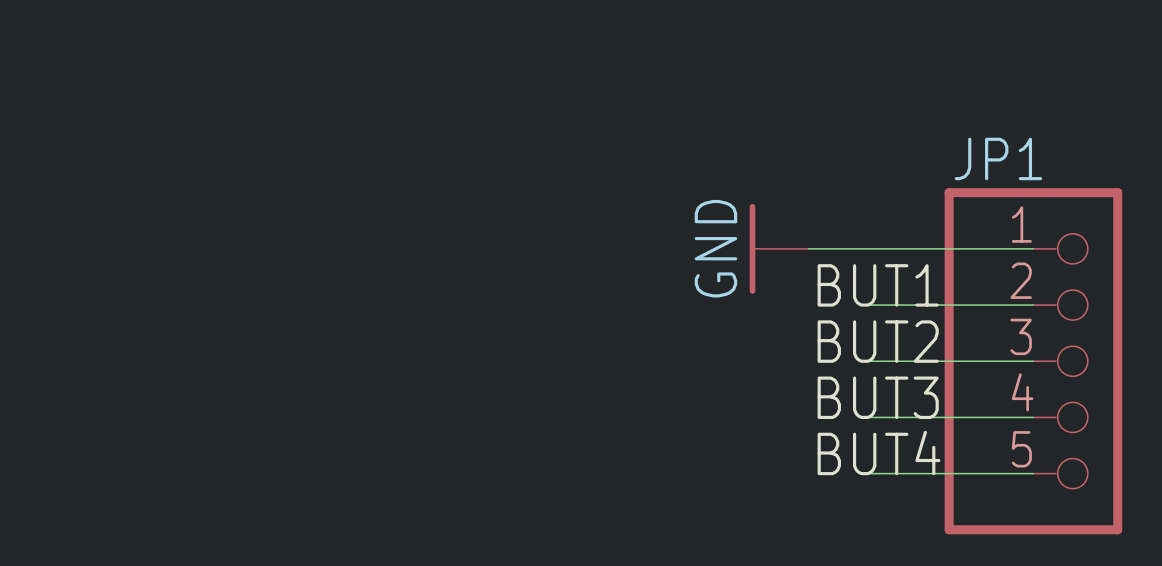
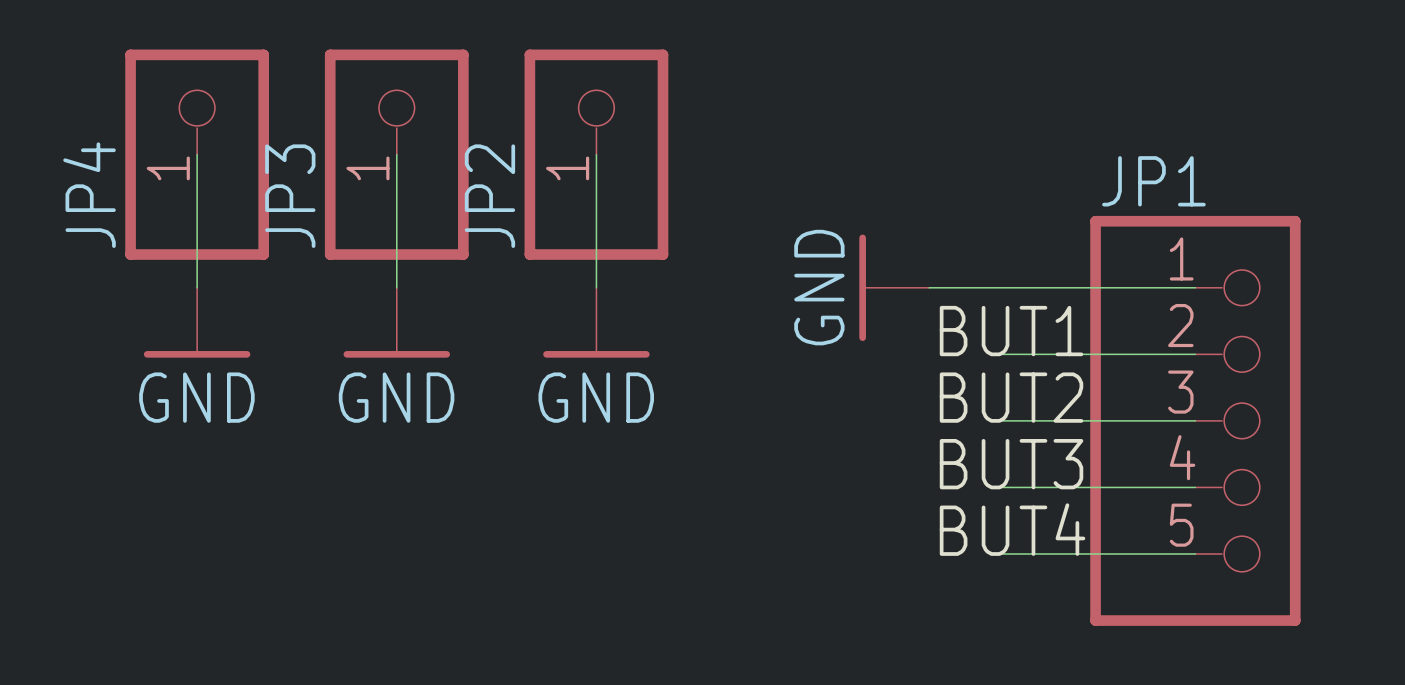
wire: none -> (197, 154) (197, 287)
JP4: none -> (197, 154)
wire: none -> (396, 154) (396, 287)
JP3: none -> (396, 154)
wire: none -> (596, 154) (596, 287)
JP2: none -> (596, 154)
power symbol: none -> GND (197, 322)
power symbol: none -> GND (396, 322)
power symbol: none -> GND (596, 322)

